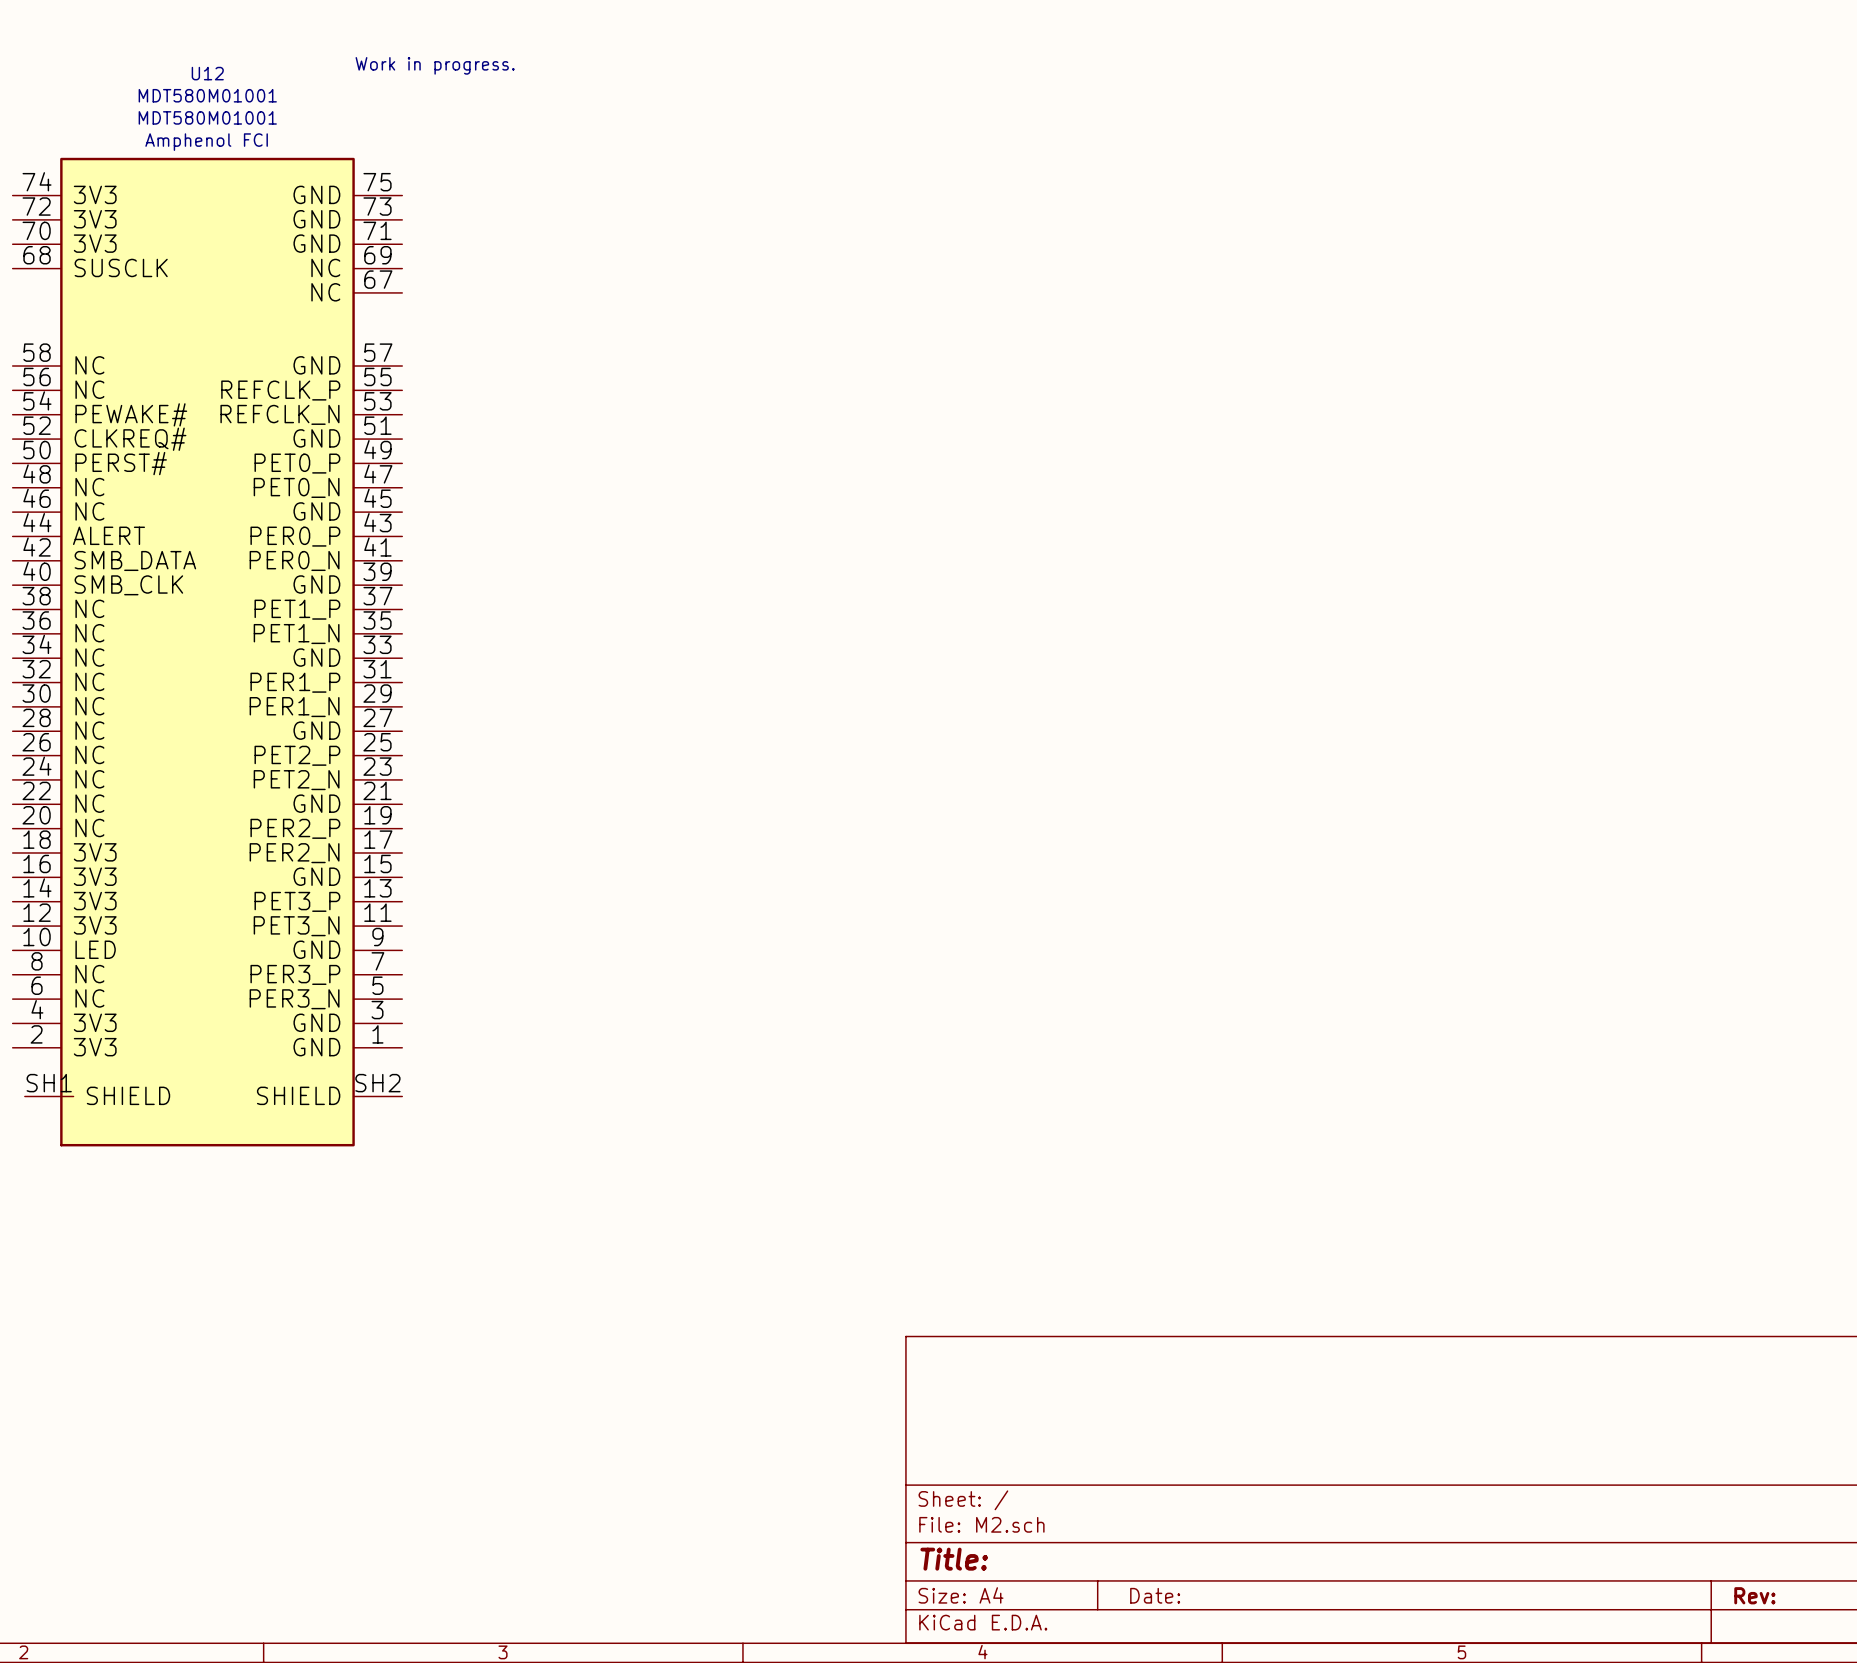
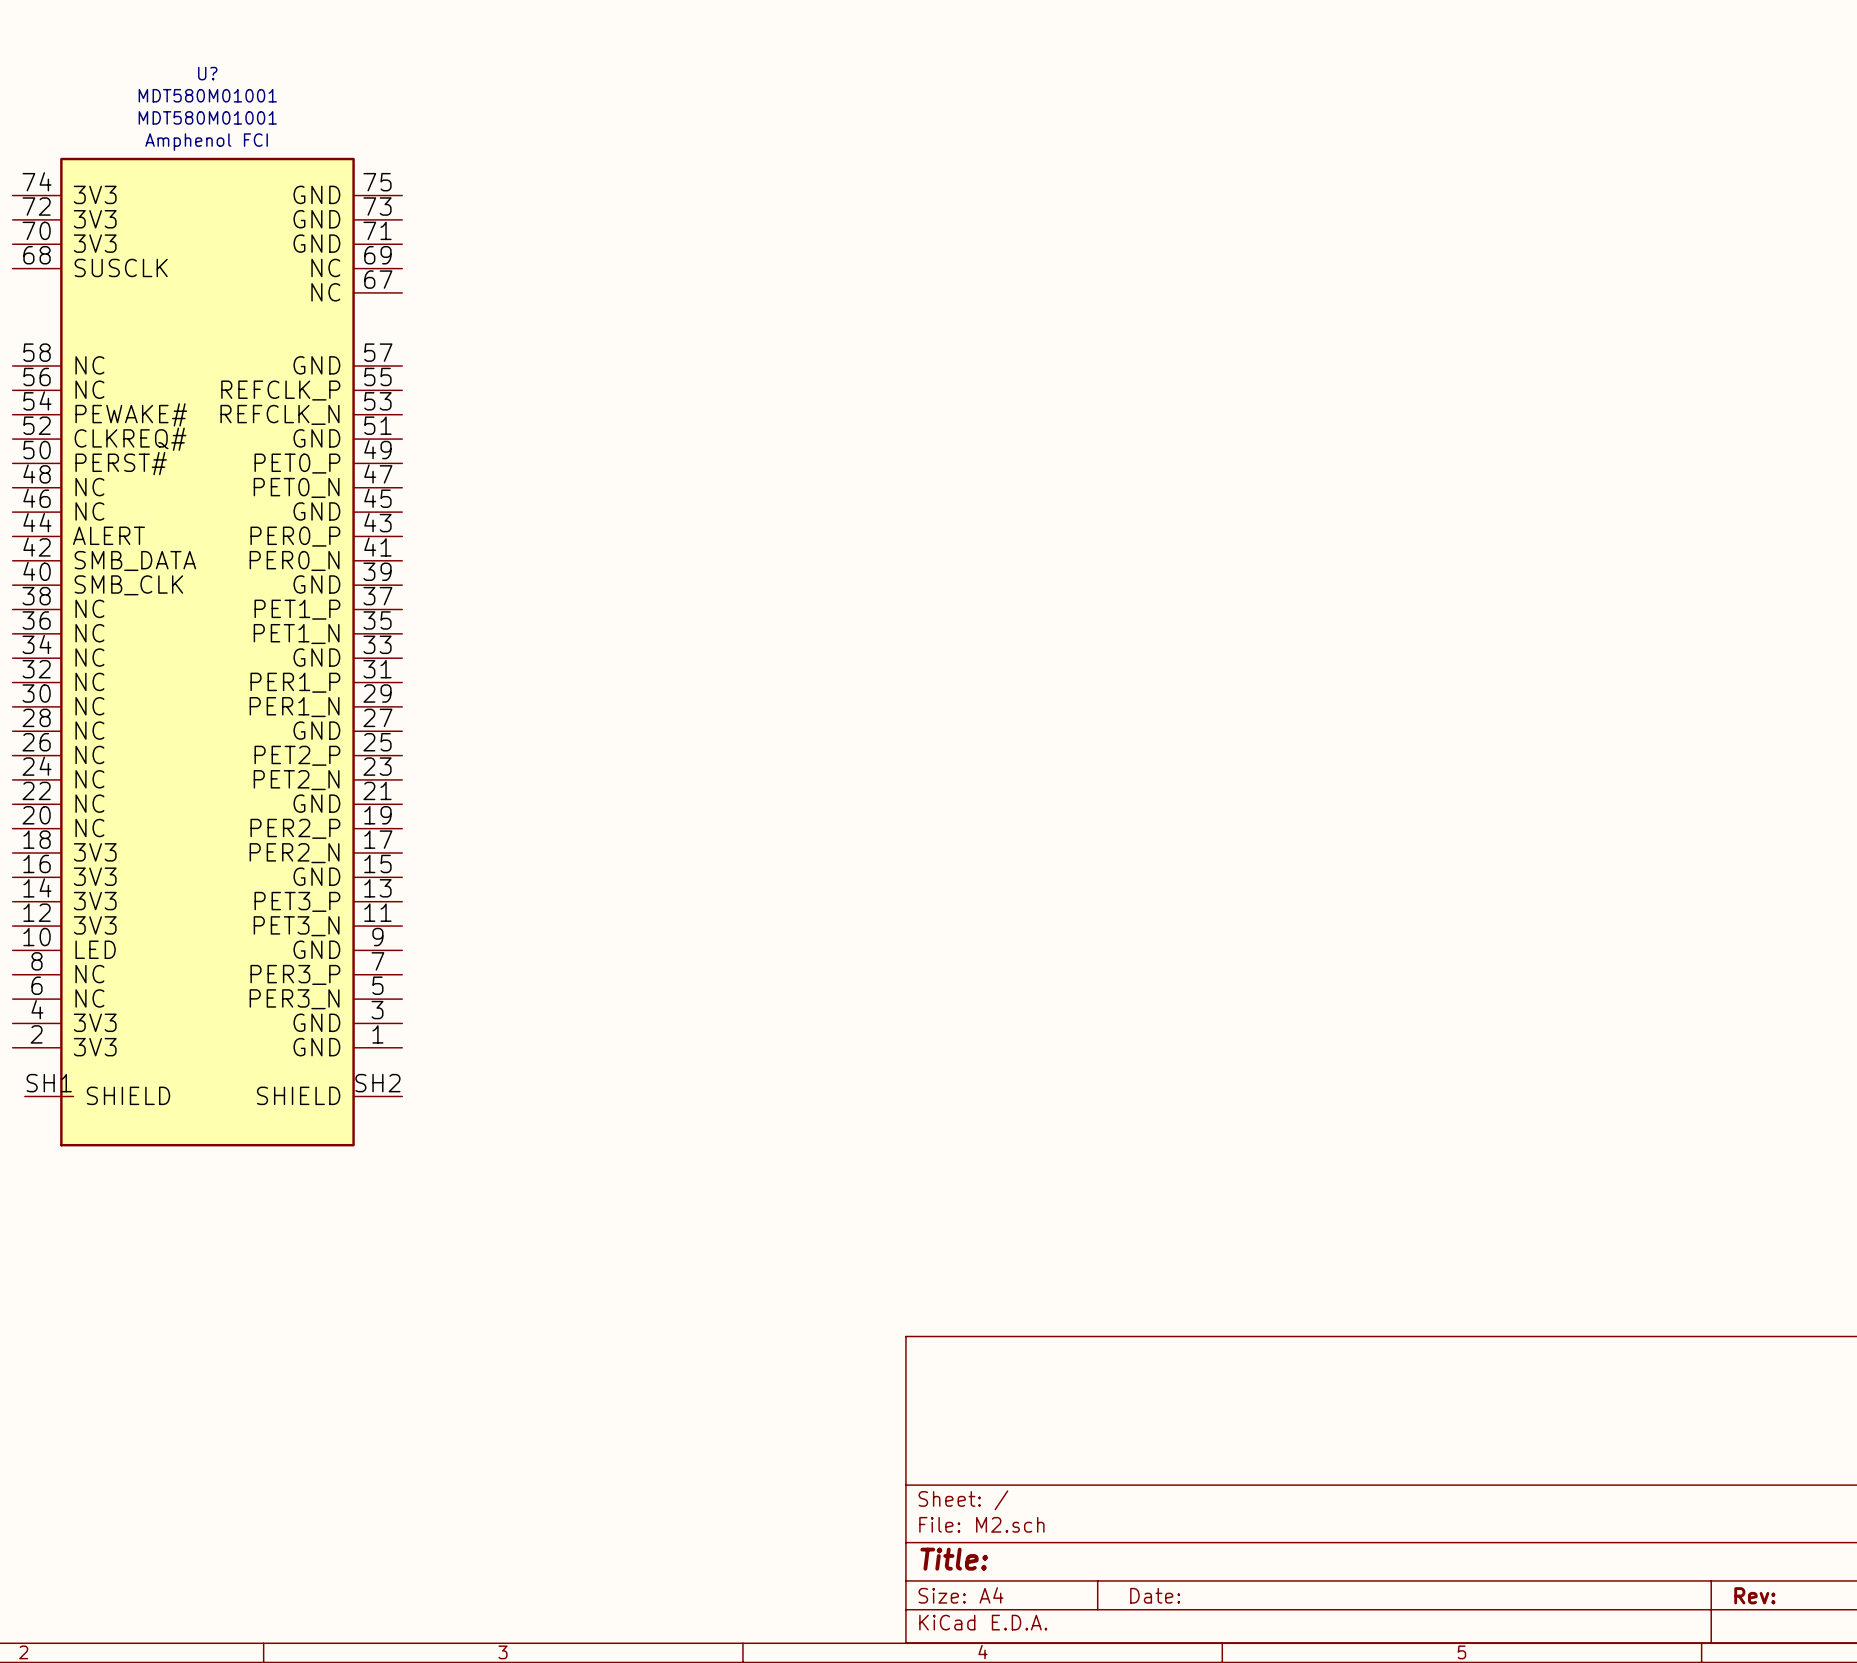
text: Work in progress. (435, 65) -> none
U12 name: U12 (207, 73) -> U? (207, 73)

